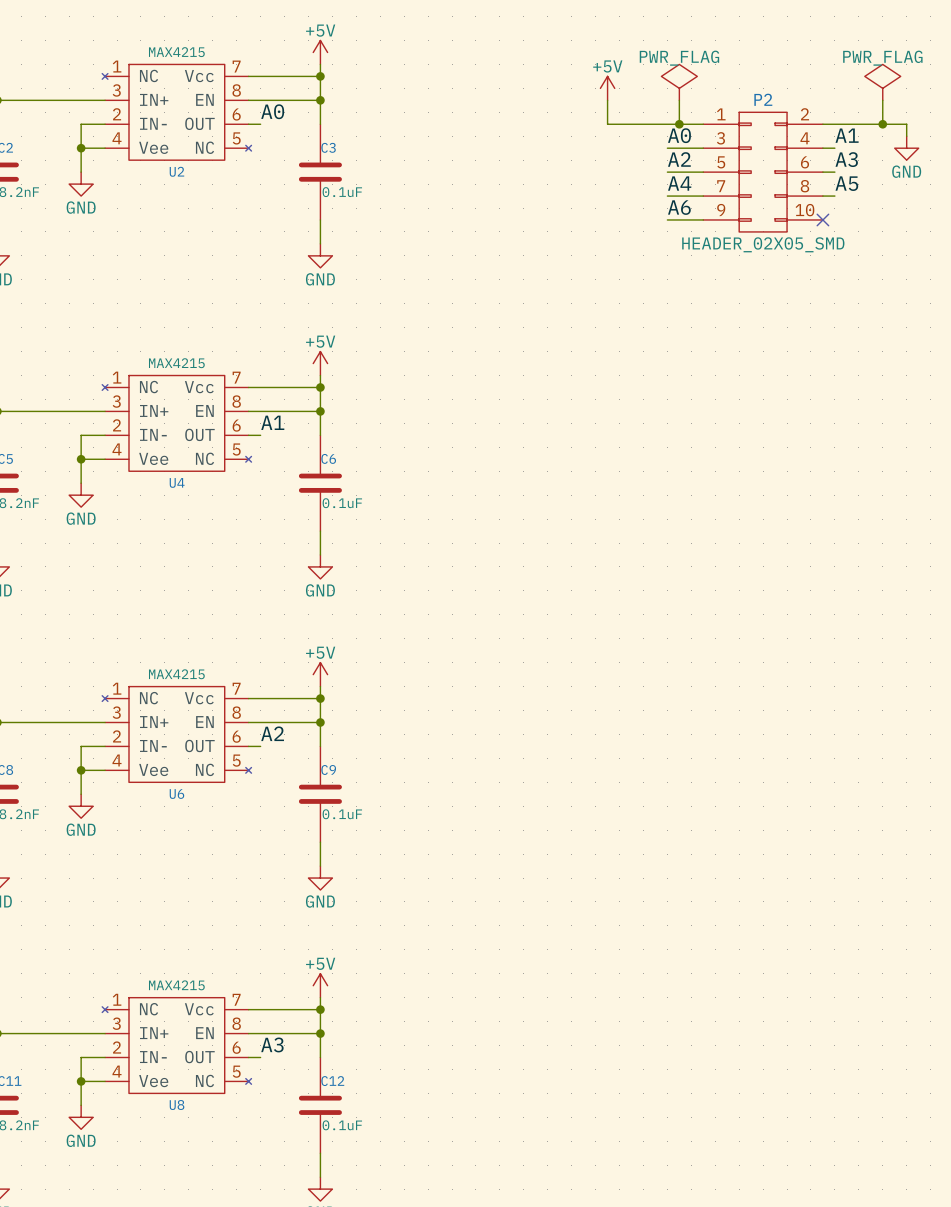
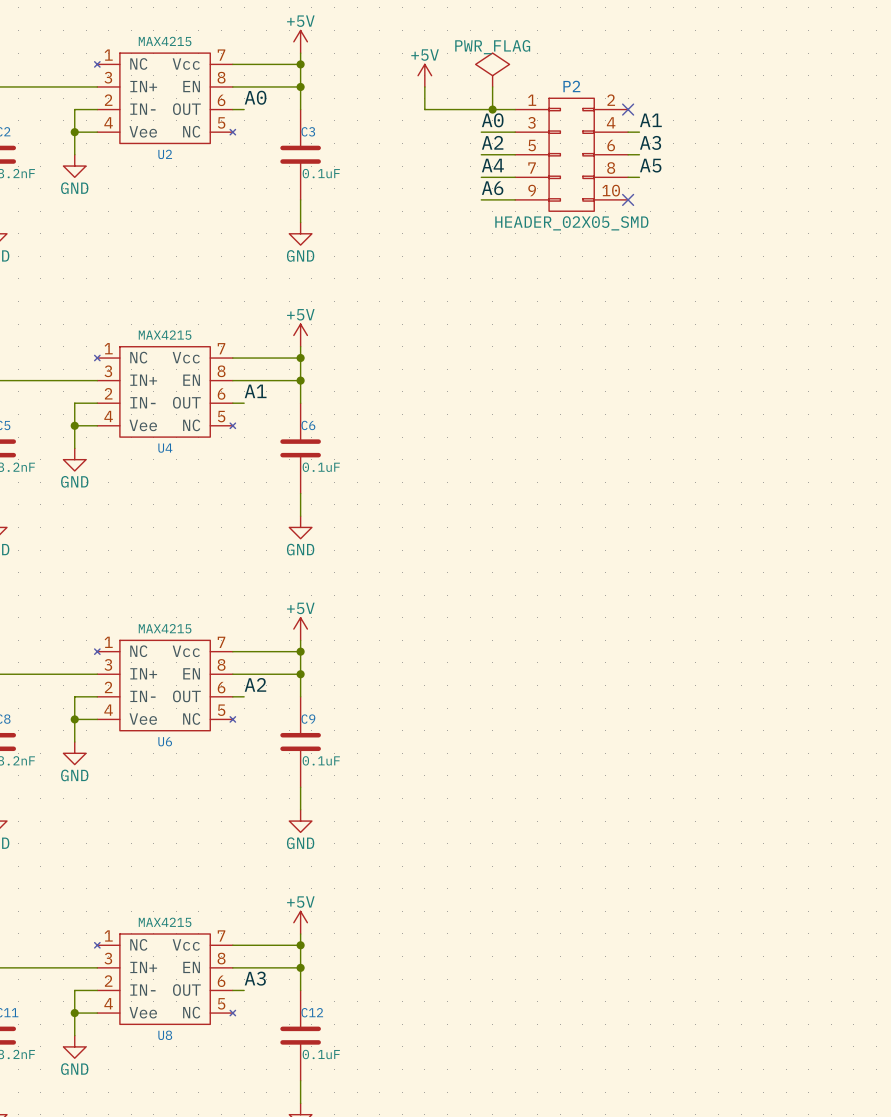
power symbol position: PWR_FLAG (679, 82) -> PWR_FLAG (492, 70)
power symbol: PWR_FLAG (882, 82) -> none
power symbol position: +5V (607, 88) -> +5V (424, 75)
wire: (607, 100) (607, 124) (703, 124) -> (424, 86) (424, 109) (515, 109)
wire: (679, 100) (679, 124) -> (492, 86) (492, 109)
wire: (882, 100) (882, 124) -> none
junction: none -> (492, 109)
no-connect mark: none -> (628, 109)
junction: (679, 124) -> none
wire: (822, 124) (906, 124) (906, 136) -> none
junction: (882, 124) -> none
label position: A0 (679, 135) -> A0 (492, 120)
label position: A1 (847, 135) -> A1 (650, 120)
wire: none -> (481, 132) (515, 132)
wire: (679, 148) (703, 148) -> none
wire: (822, 148) (834, 148) -> none
power symbol: GND (906, 148) -> none
label position: A2 (679, 159) -> A2 (492, 142)
label position: A3 (846, 159) -> A3 (650, 142)
wire: none -> (481, 154) (515, 154)
wire: (679, 172) (703, 172) -> none
P2 position: (763, 172) -> (571, 154)
wire: (822, 172) (834, 172) -> none
label position: A4 (679, 183) -> A4 (492, 165)
label position: A5 (846, 183) -> A5 (650, 165)
wire: none -> (481, 177) (515, 177)
wire: (679, 196) (703, 196) -> none
wire: (822, 196) (834, 196) -> none
label position: A6 (679, 207) -> A6 (492, 188)
wire: (667, 219) (703, 219) -> (481, 199) (515, 199)
no-connect mark: none -> (628, 199)
no-connect mark: (822, 219) -> none

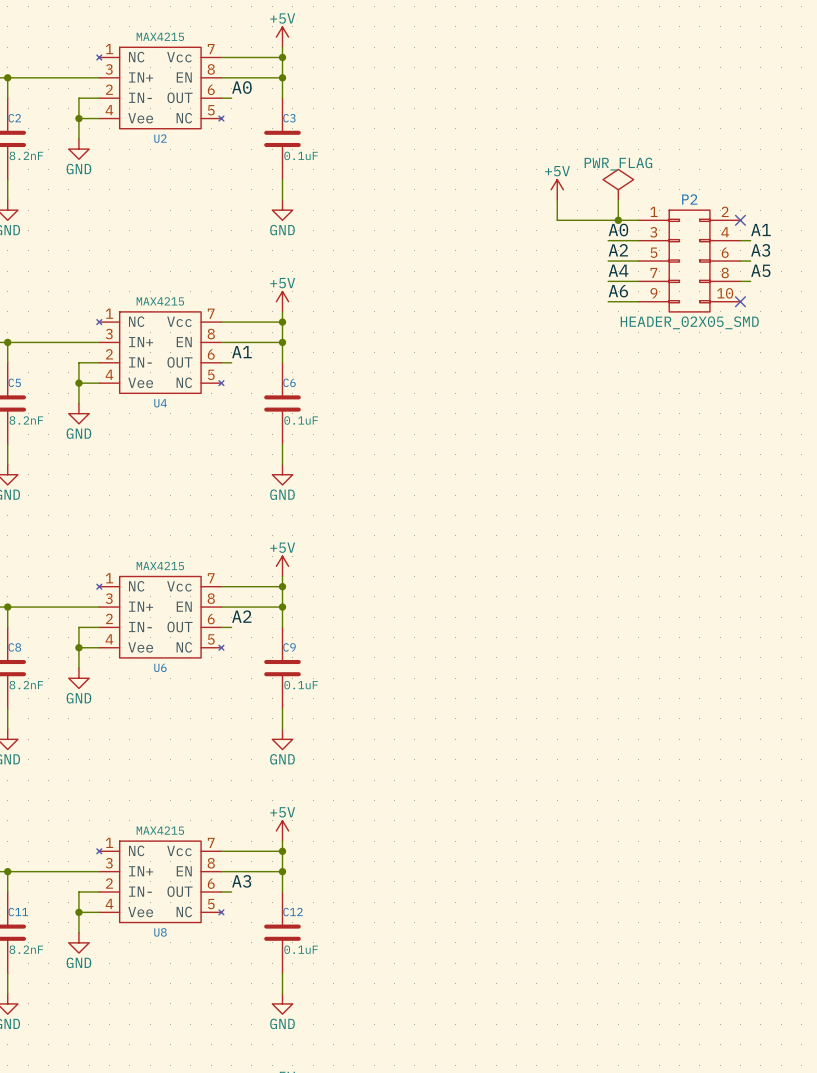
power symbol: PWR_FLAG (492, 70) -> none
power symbol: +5V (424, 75) -> none
wire: (424, 86) (424, 109) (515, 109) -> none
wire: (492, 86) (492, 109) -> none
junction: (492, 109) -> none
no-connect mark: (628, 109) -> none
label: A0 (492, 120) -> none
label: A1 (650, 120) -> none
wire: (481, 132) (515, 132) -> none
wire: (628, 132) (639, 132) -> none
label: A2 (492, 142) -> none
label: A3 (650, 142) -> none
wire: (481, 154) (515, 154) -> (608, 240) (638, 240)
P2 position: (571, 154) -> (689, 261)
wire: (628, 154) (639, 154) -> (740, 240) (750, 240)
label: A4 (492, 165) -> none
label: A5 (650, 165) -> none
wire: (481, 177) (515, 177) -> (608, 261) (638, 261)
wire: (628, 177) (639, 177) -> (740, 261) (750, 261)
label: A6 (492, 188) -> none
wire: (481, 199) (515, 199) -> (608, 281) (638, 281)
no-connect mark: (628, 199) -> none
power symbol: none -> PWR_FLAG (618, 184)
power symbol: none -> +5V (557, 189)
wire: none -> (557, 199) (557, 220) (638, 220)
wire: none -> (618, 199) (618, 220)
junction: none -> (618, 220)
no-connect mark: none -> (740, 220)
label: none -> A0 (618, 230)
label: none -> A1 (760, 230)
label: none -> A2 (618, 250)
label: none -> A3 (760, 250)
label: none -> A4 (618, 270)
label: none -> A5 (760, 270)
wire: none -> (740, 281) (750, 281)
label: none -> A6 (618, 291)
wire: none -> (608, 301) (638, 301)
no-connect mark: none -> (740, 301)

